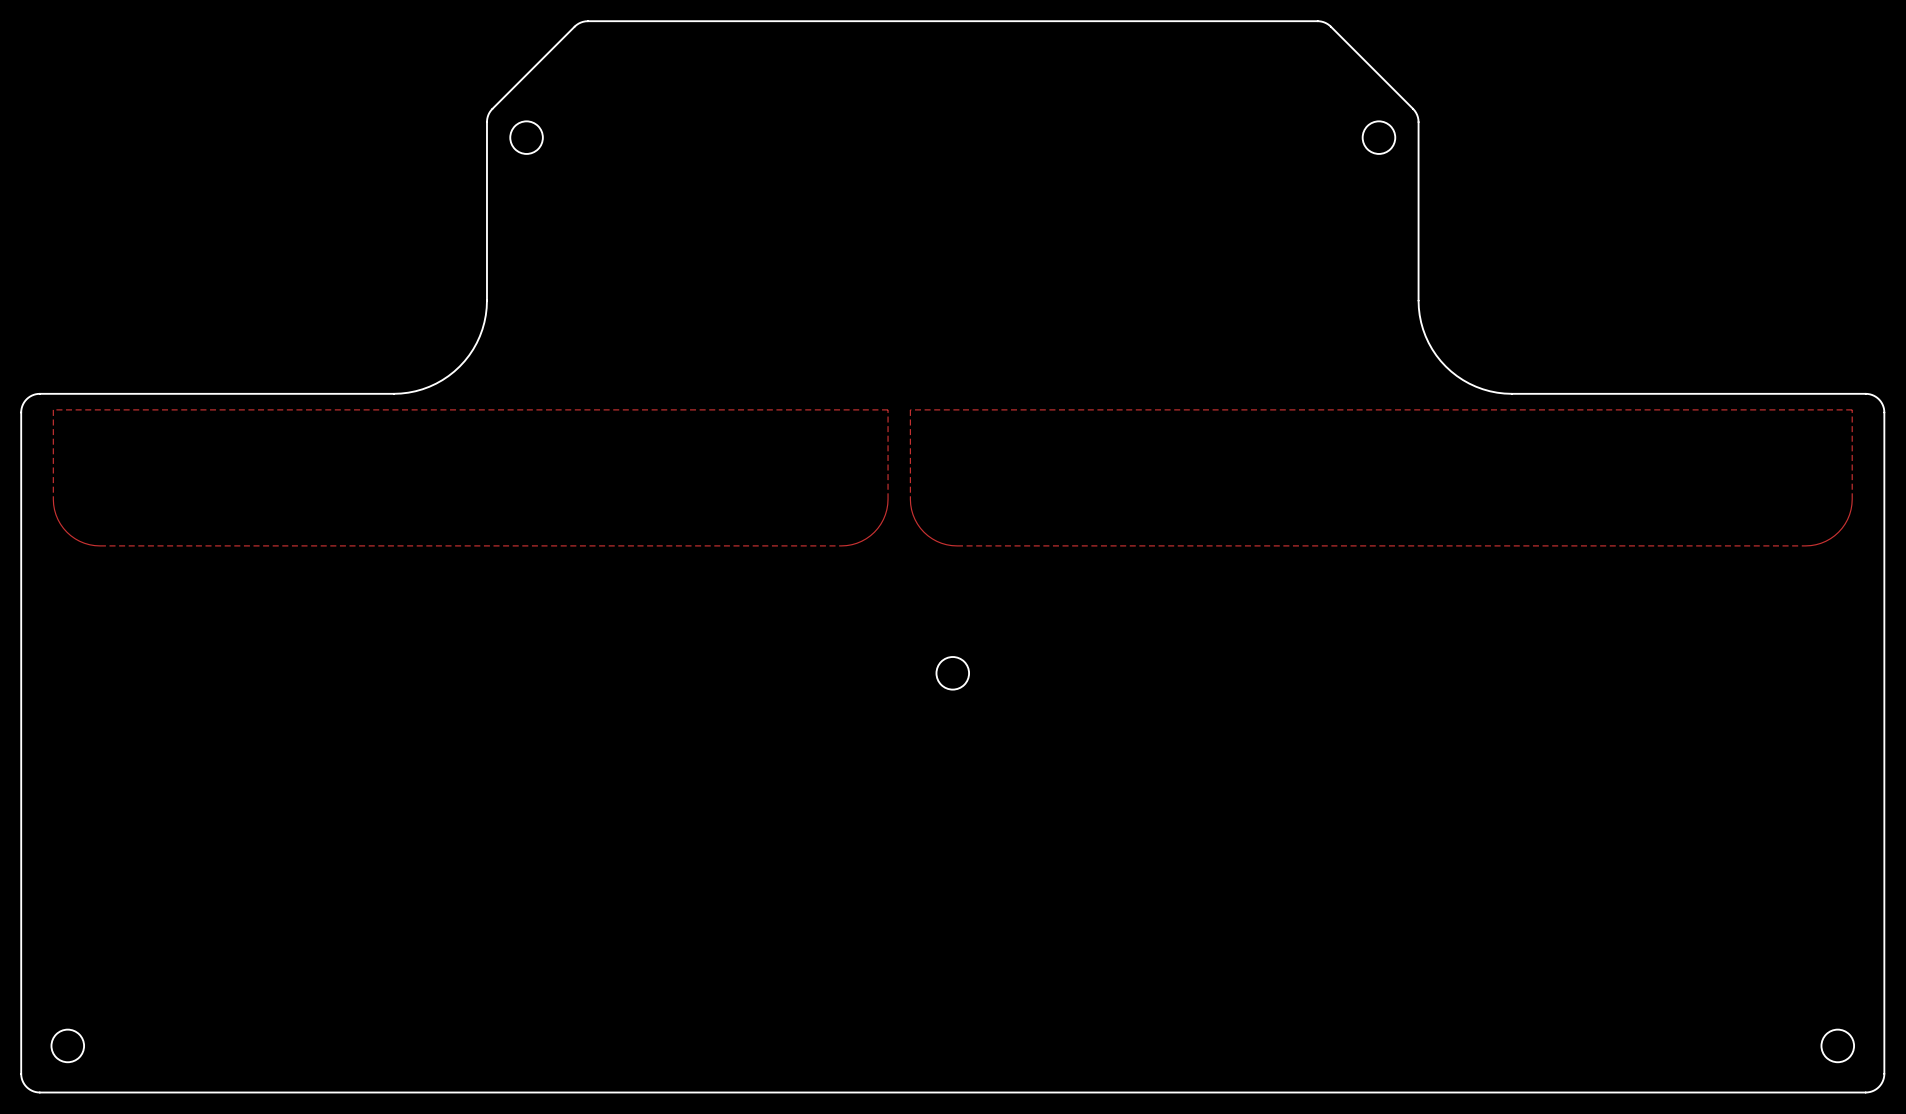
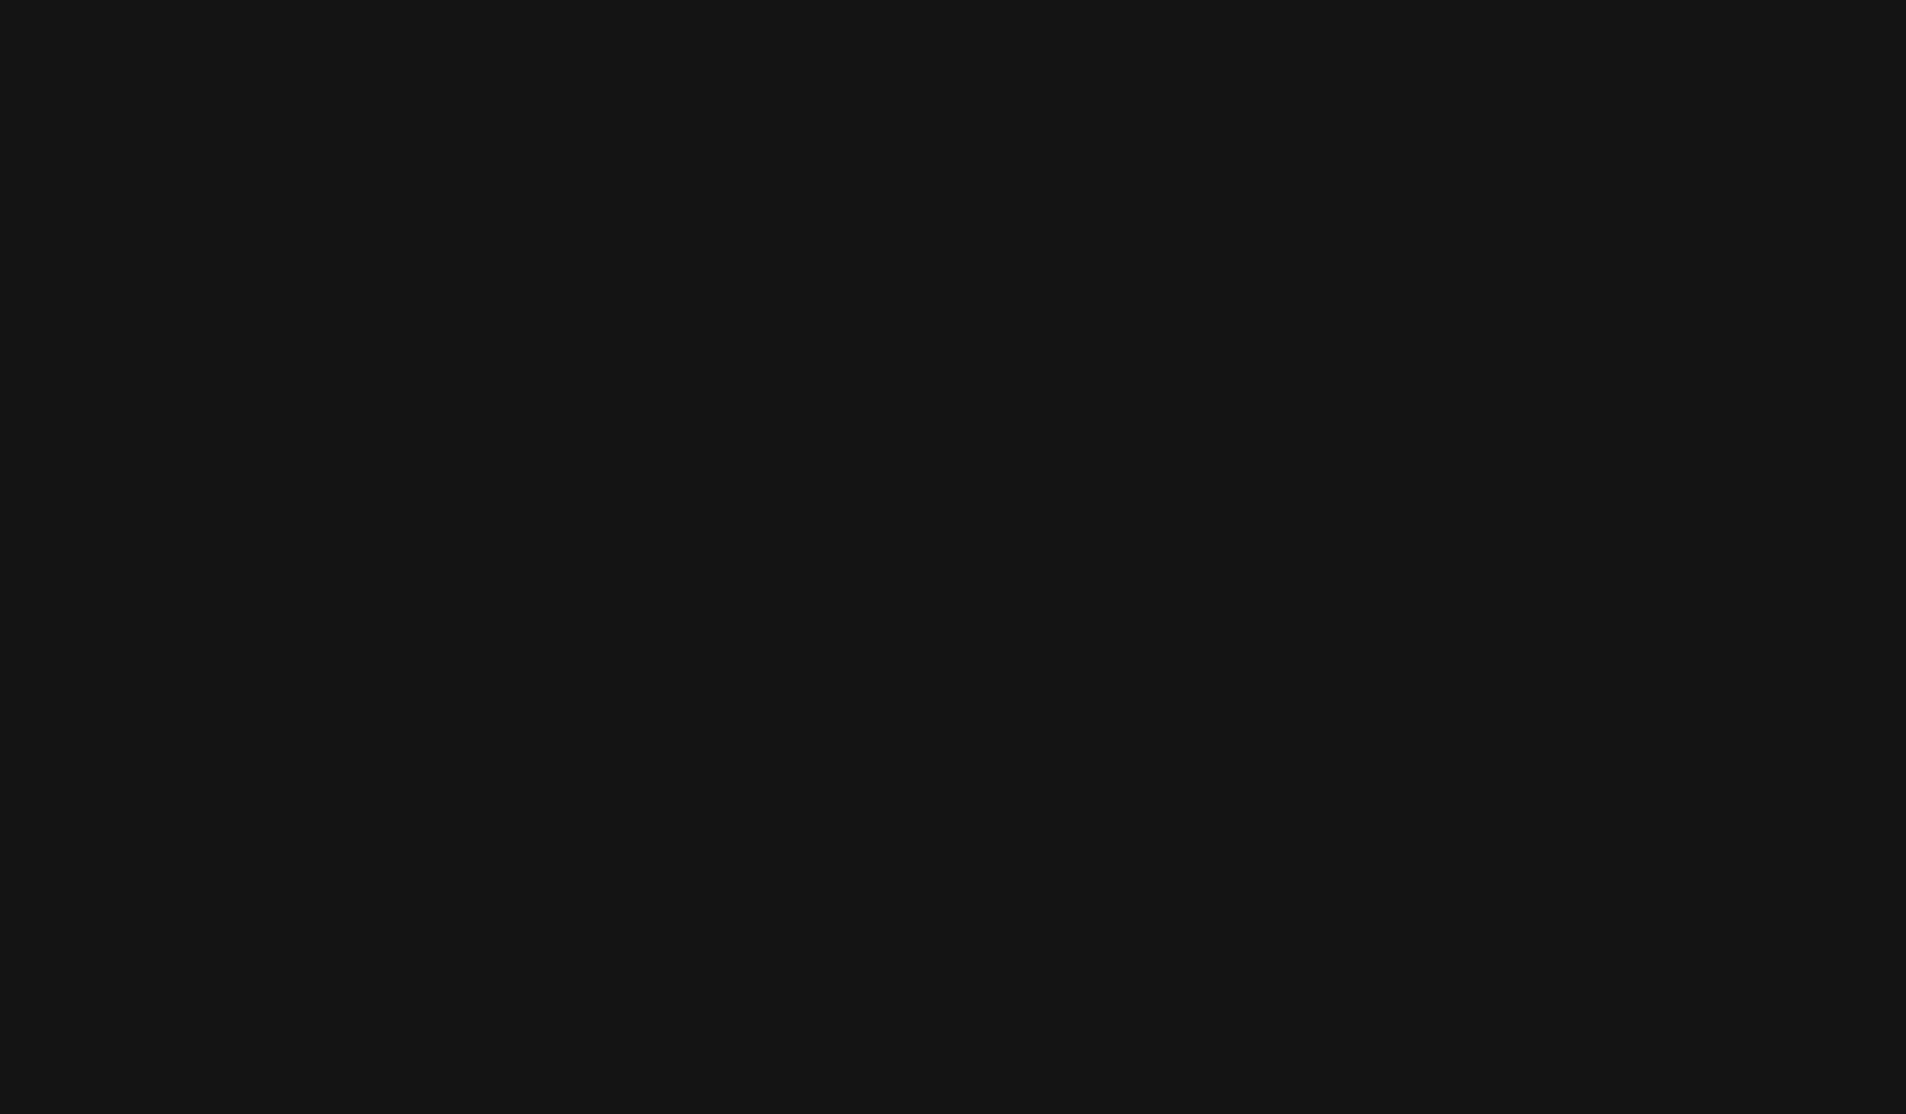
board edge: (587, 21) (1323, 22) (1330, 26) (1417, 114) (1419, 315) (1423, 329) (1432, 349) (1440, 361) (1456, 376) (1482, 389) (1504, 393) (1865, 393) (1877, 397) (1882, 404) (1884, 412) (1884, 1073) (1880, 1085) (1873, 1090) (1865, 1092) (39, 1092) (28, 1088) (23, 1081) (21, 1073) (21, 412) (23, 404) (29, 396) (39, 393) (401, 393) (429, 386) (448, 376) (459, 366) (473, 349) (482, 329) (485, 315) (488, 114) (574, 26) (587, 21) -> none
round board edge: [509, 120, 544, 155] -> none
round board edge: [1361, 120, 1397, 155] -> none
zone outline: (53, 409) (888, 409) (887, 504) (883, 519) (874, 532) (861, 541) (841, 545) (94, 545) (84, 543) (70, 535) (63, 528) (55, 514) (53, 499) (53, 409) -> none
zone outline: (910, 409) (1852, 409) (1851, 504) (1847, 519) (1834, 535) (1821, 543) (1805, 545) (951, 545) (936, 541) (927, 535) (920, 528) (913, 514) (910, 499) (910, 409) -> none
round board edge: [935, 656, 971, 691] -> none
round board edge: [50, 1028, 86, 1064] -> none
round board edge: [1820, 1028, 1856, 1064] -> none

